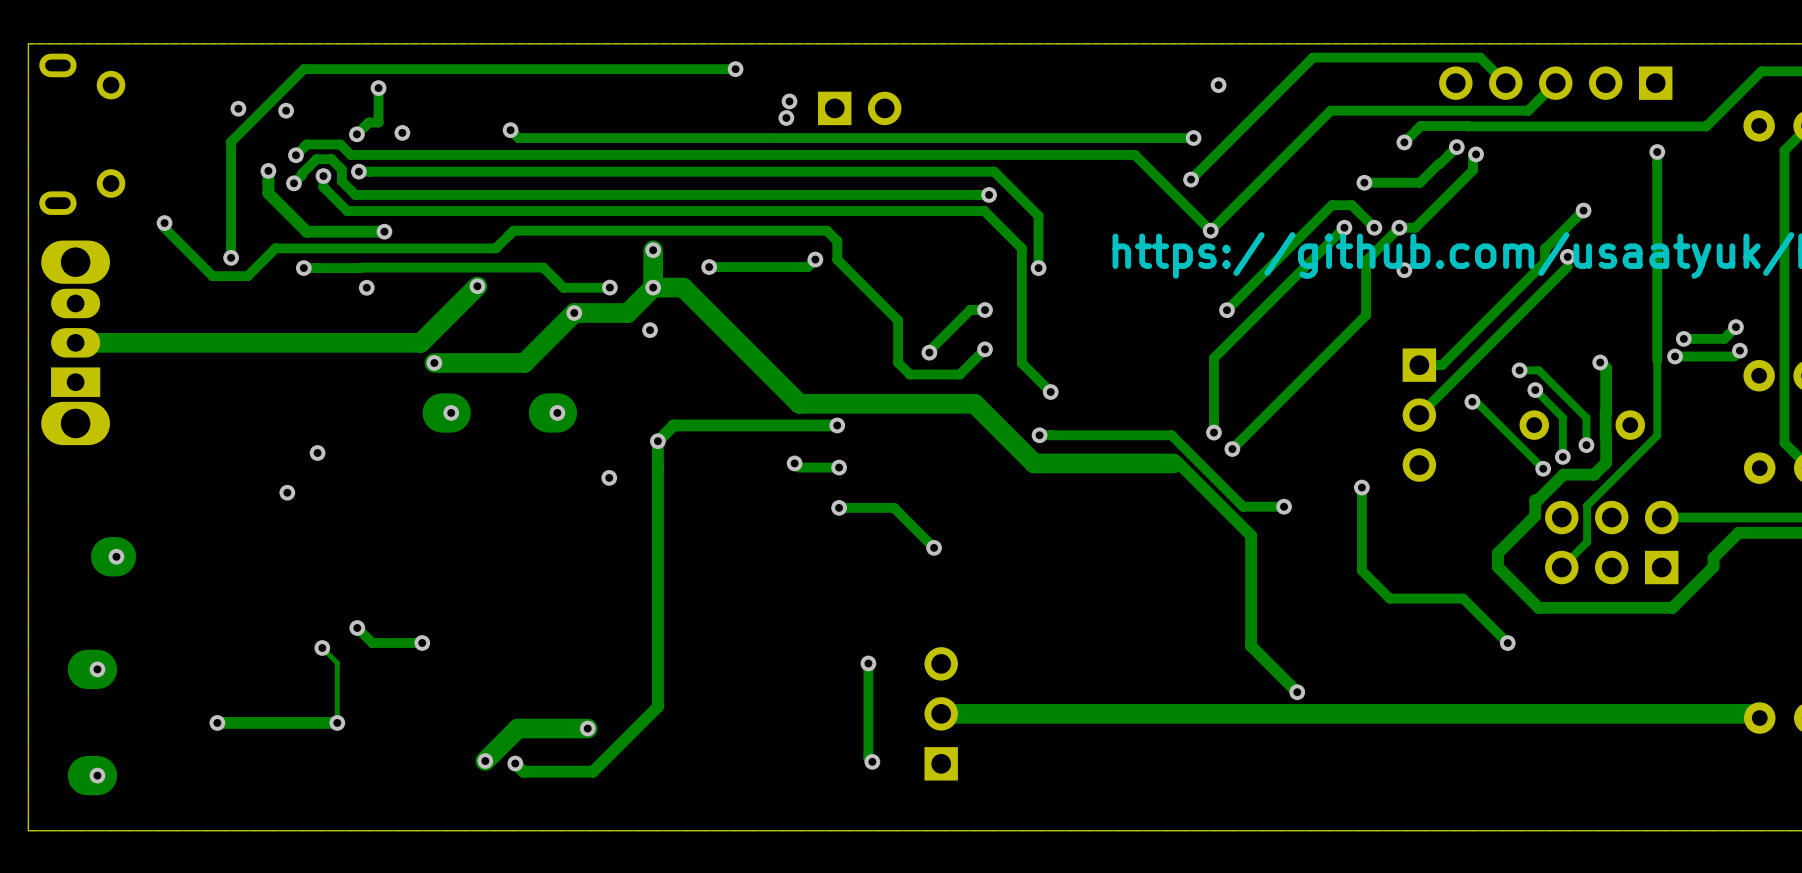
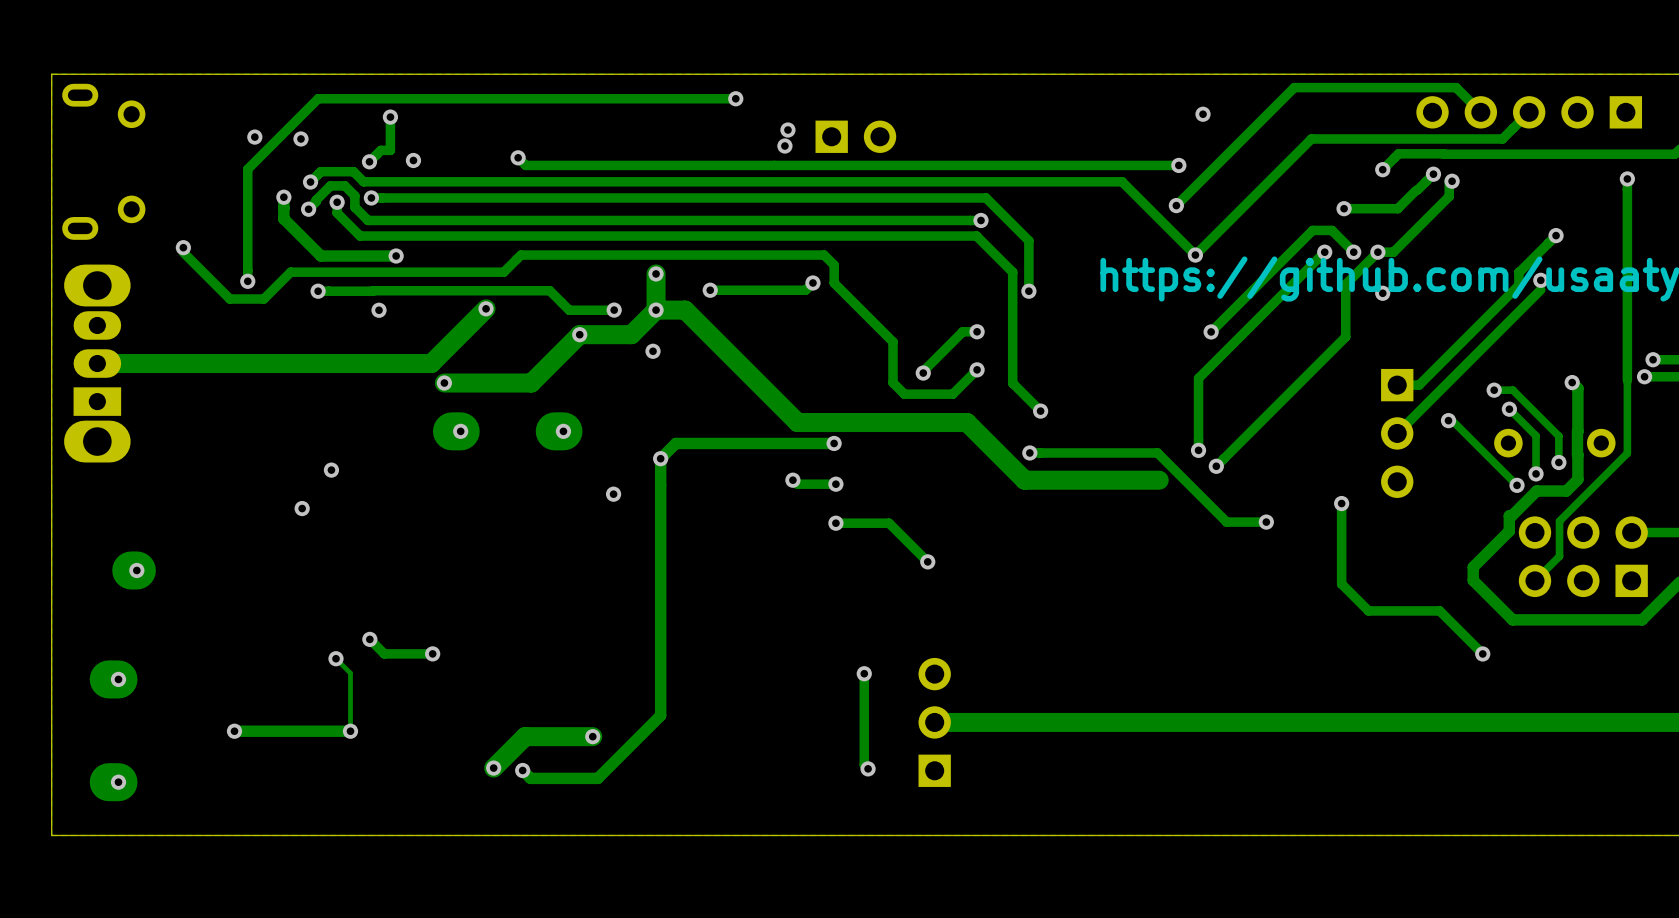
track: (1173, 463) (1178, 463) (1251, 535) (1251, 646) (1297, 692) -> none
via: (1297, 692) -> none

